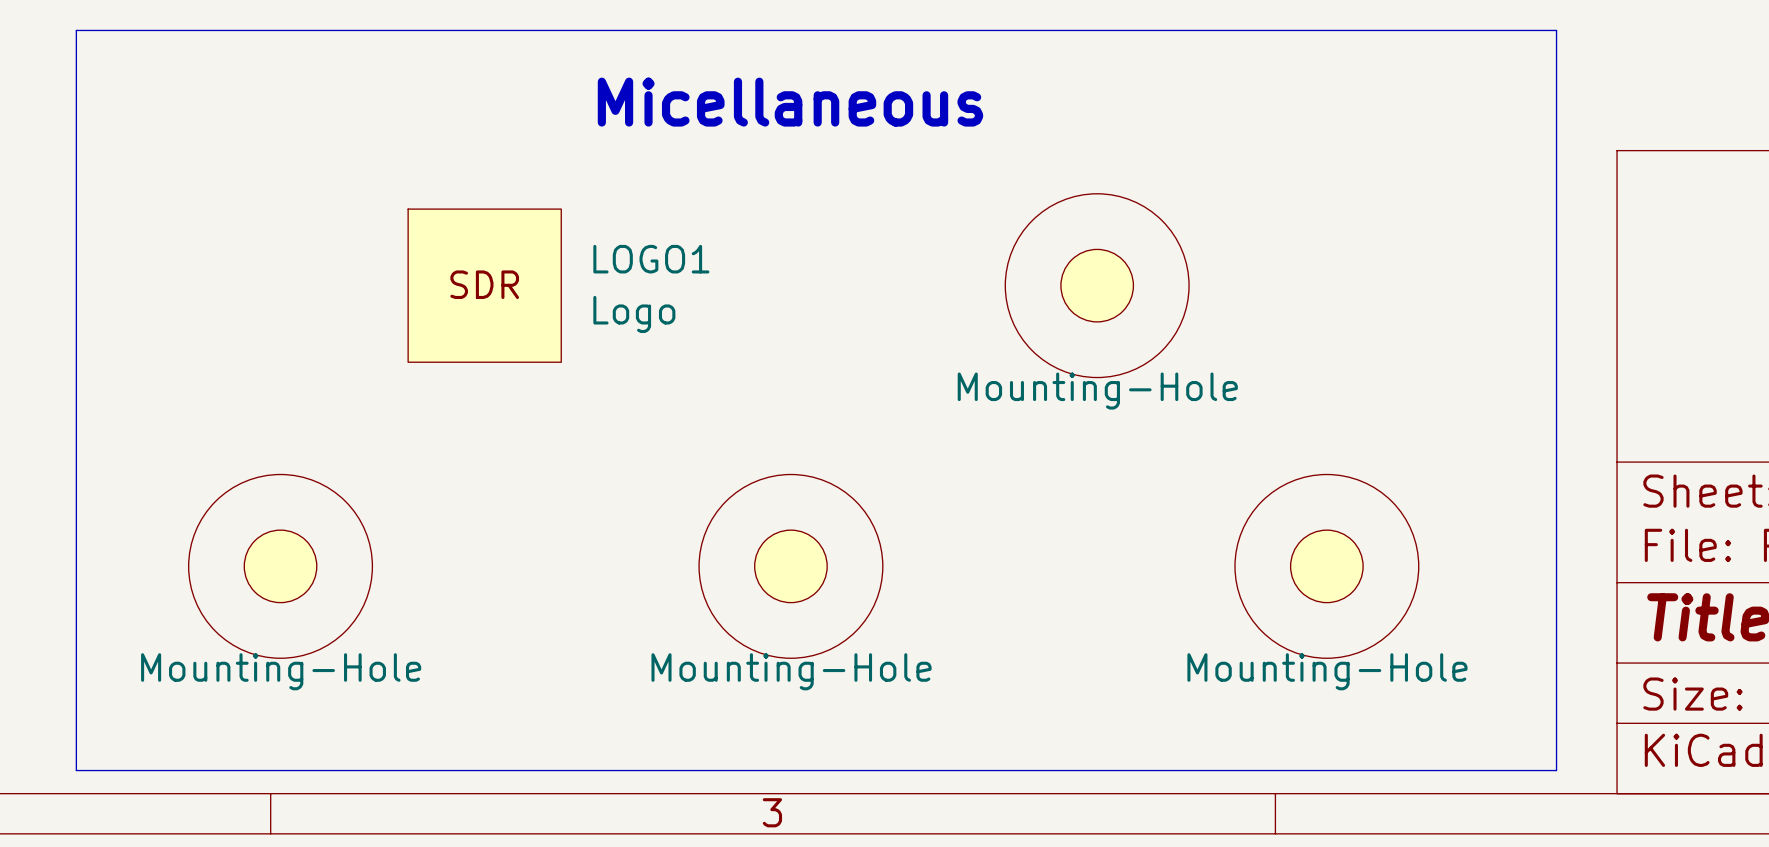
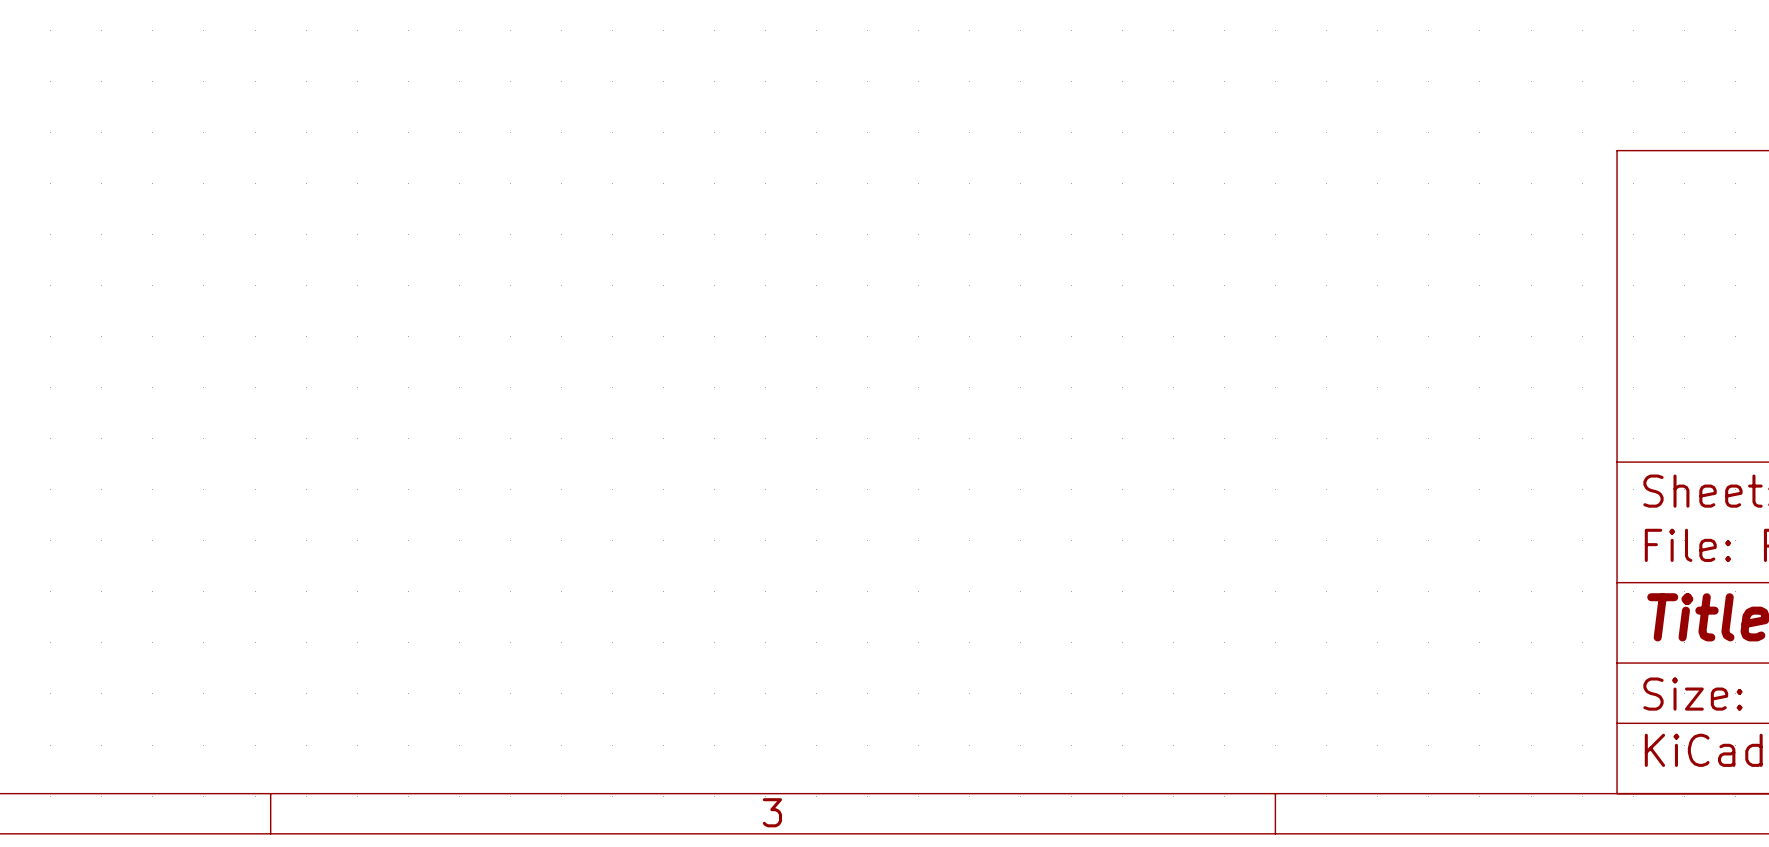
line: (76, 30) (1556, 30) (1556, 770) (76, 770) (76, 30) -> none
text: Micellaneous (790, 102) -> none
LOGO1: Logo (484, 285) -> none
part: Mounting-Hole (1097, 285) -> none
part: Mounting-Hole (280, 566) -> none
part: Mounting-Hole (790, 566) -> none
part: Mounting-Hole (1326, 566) -> none

